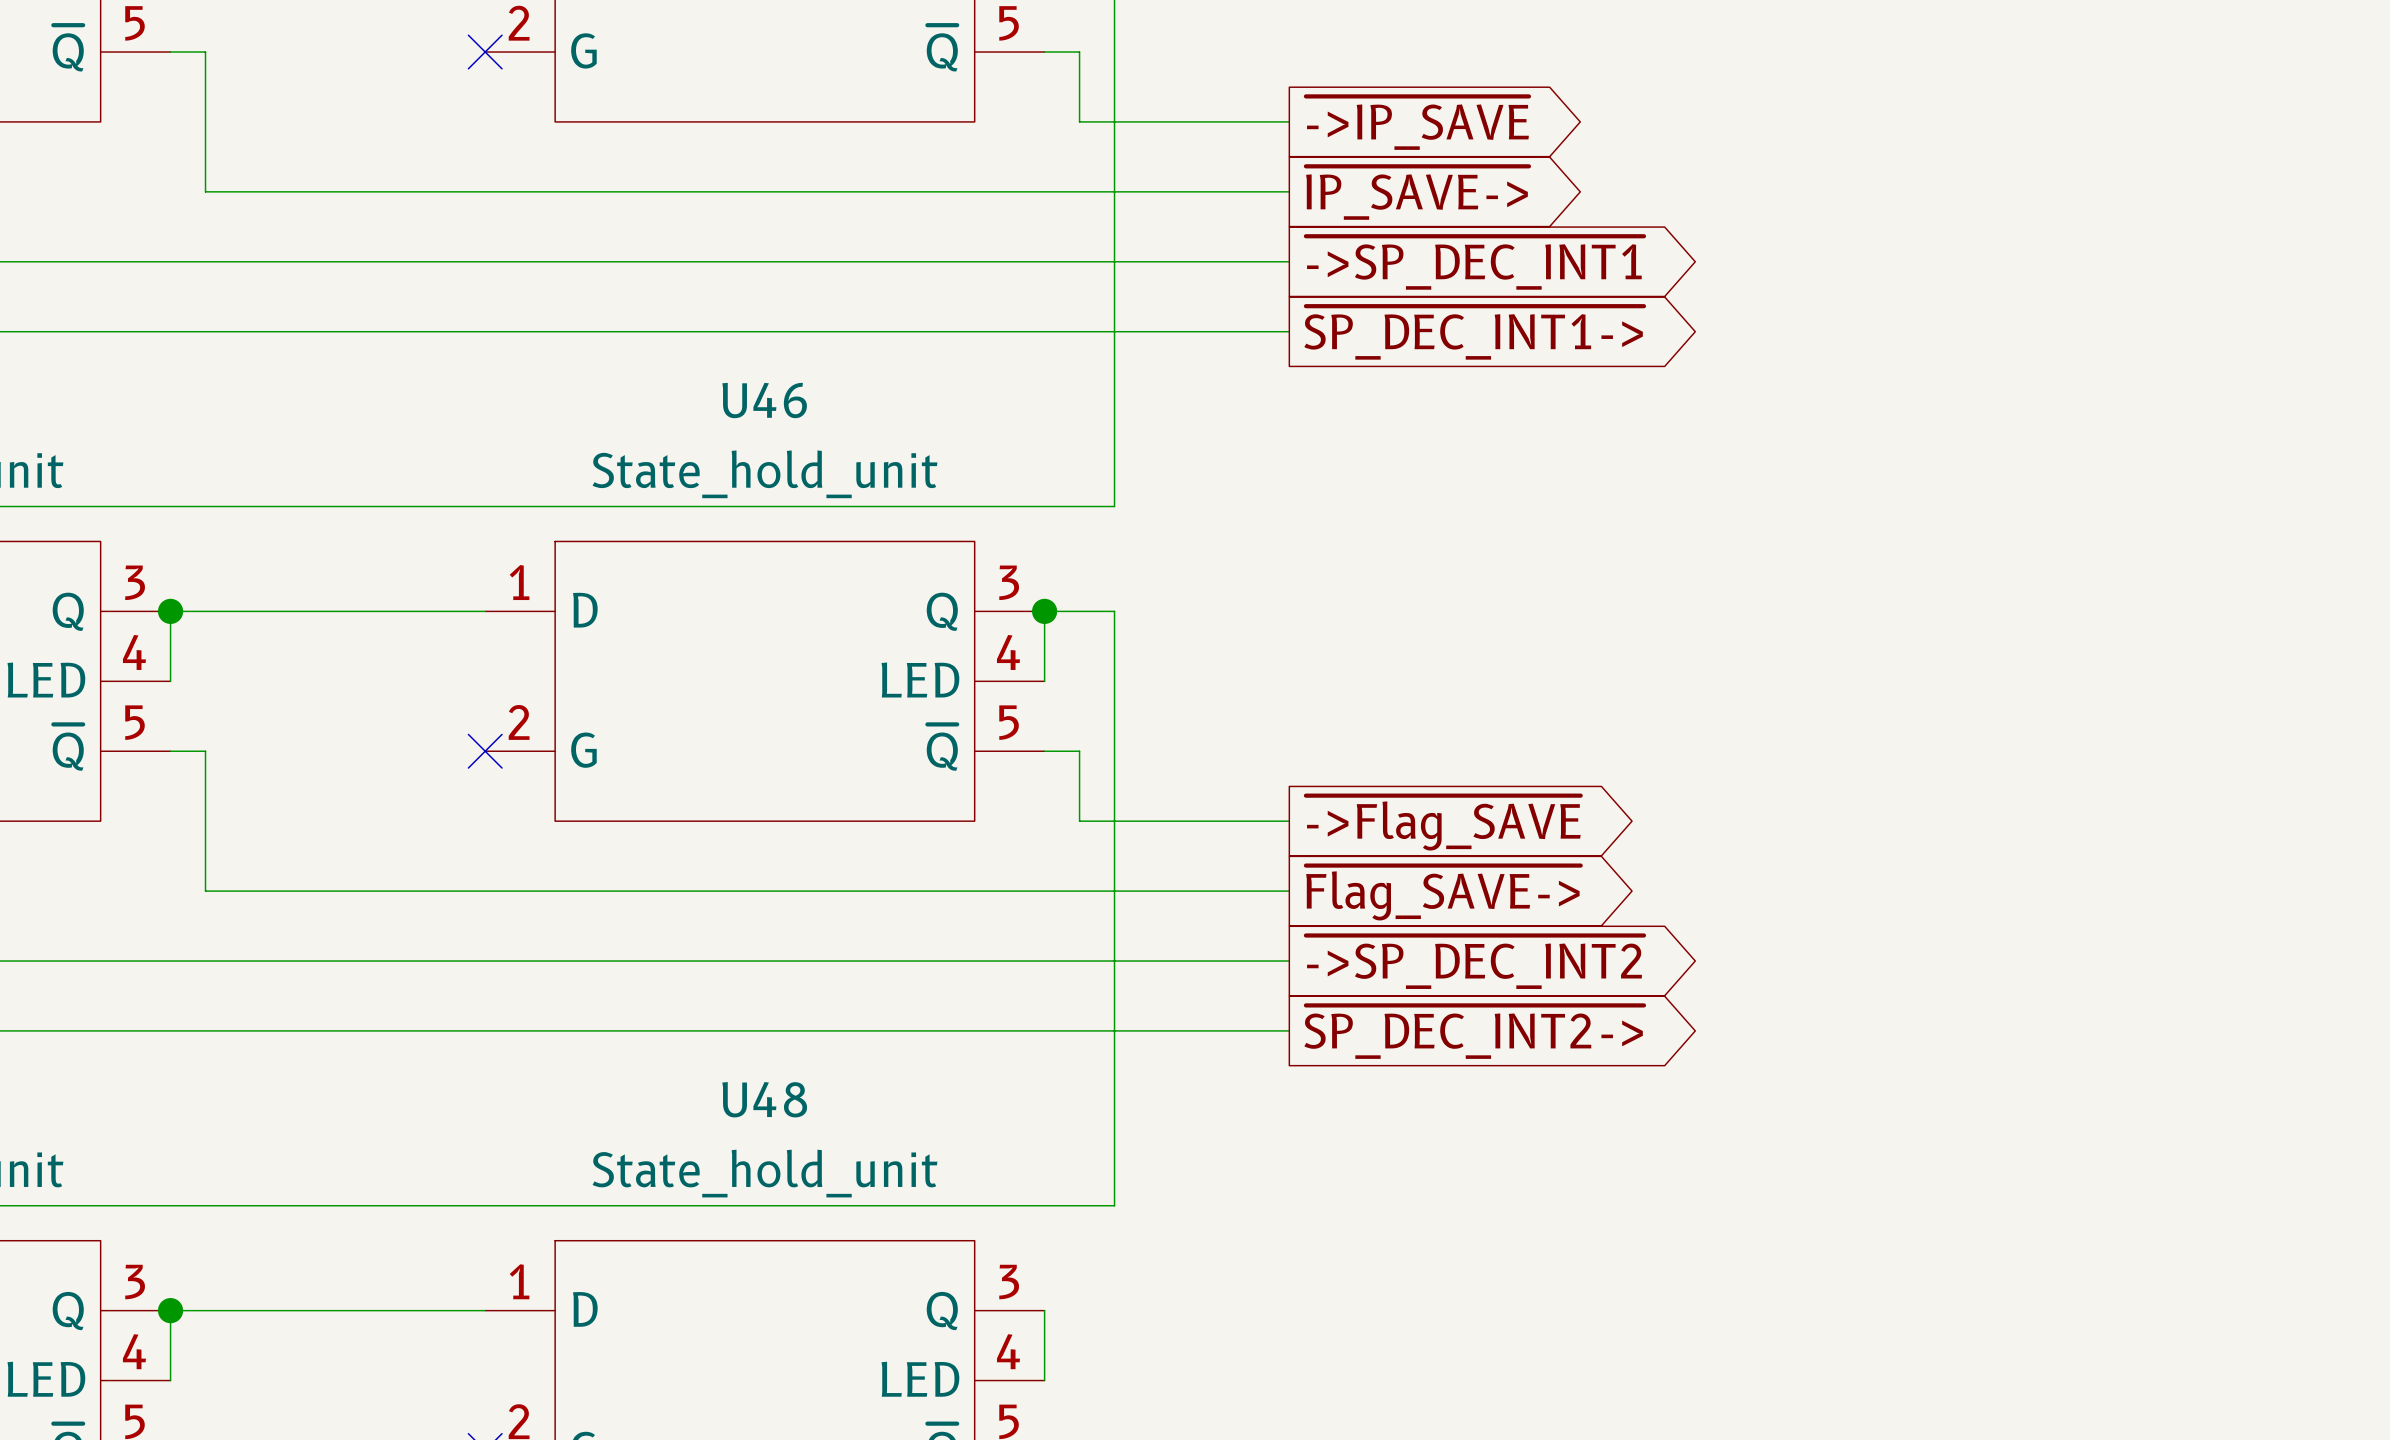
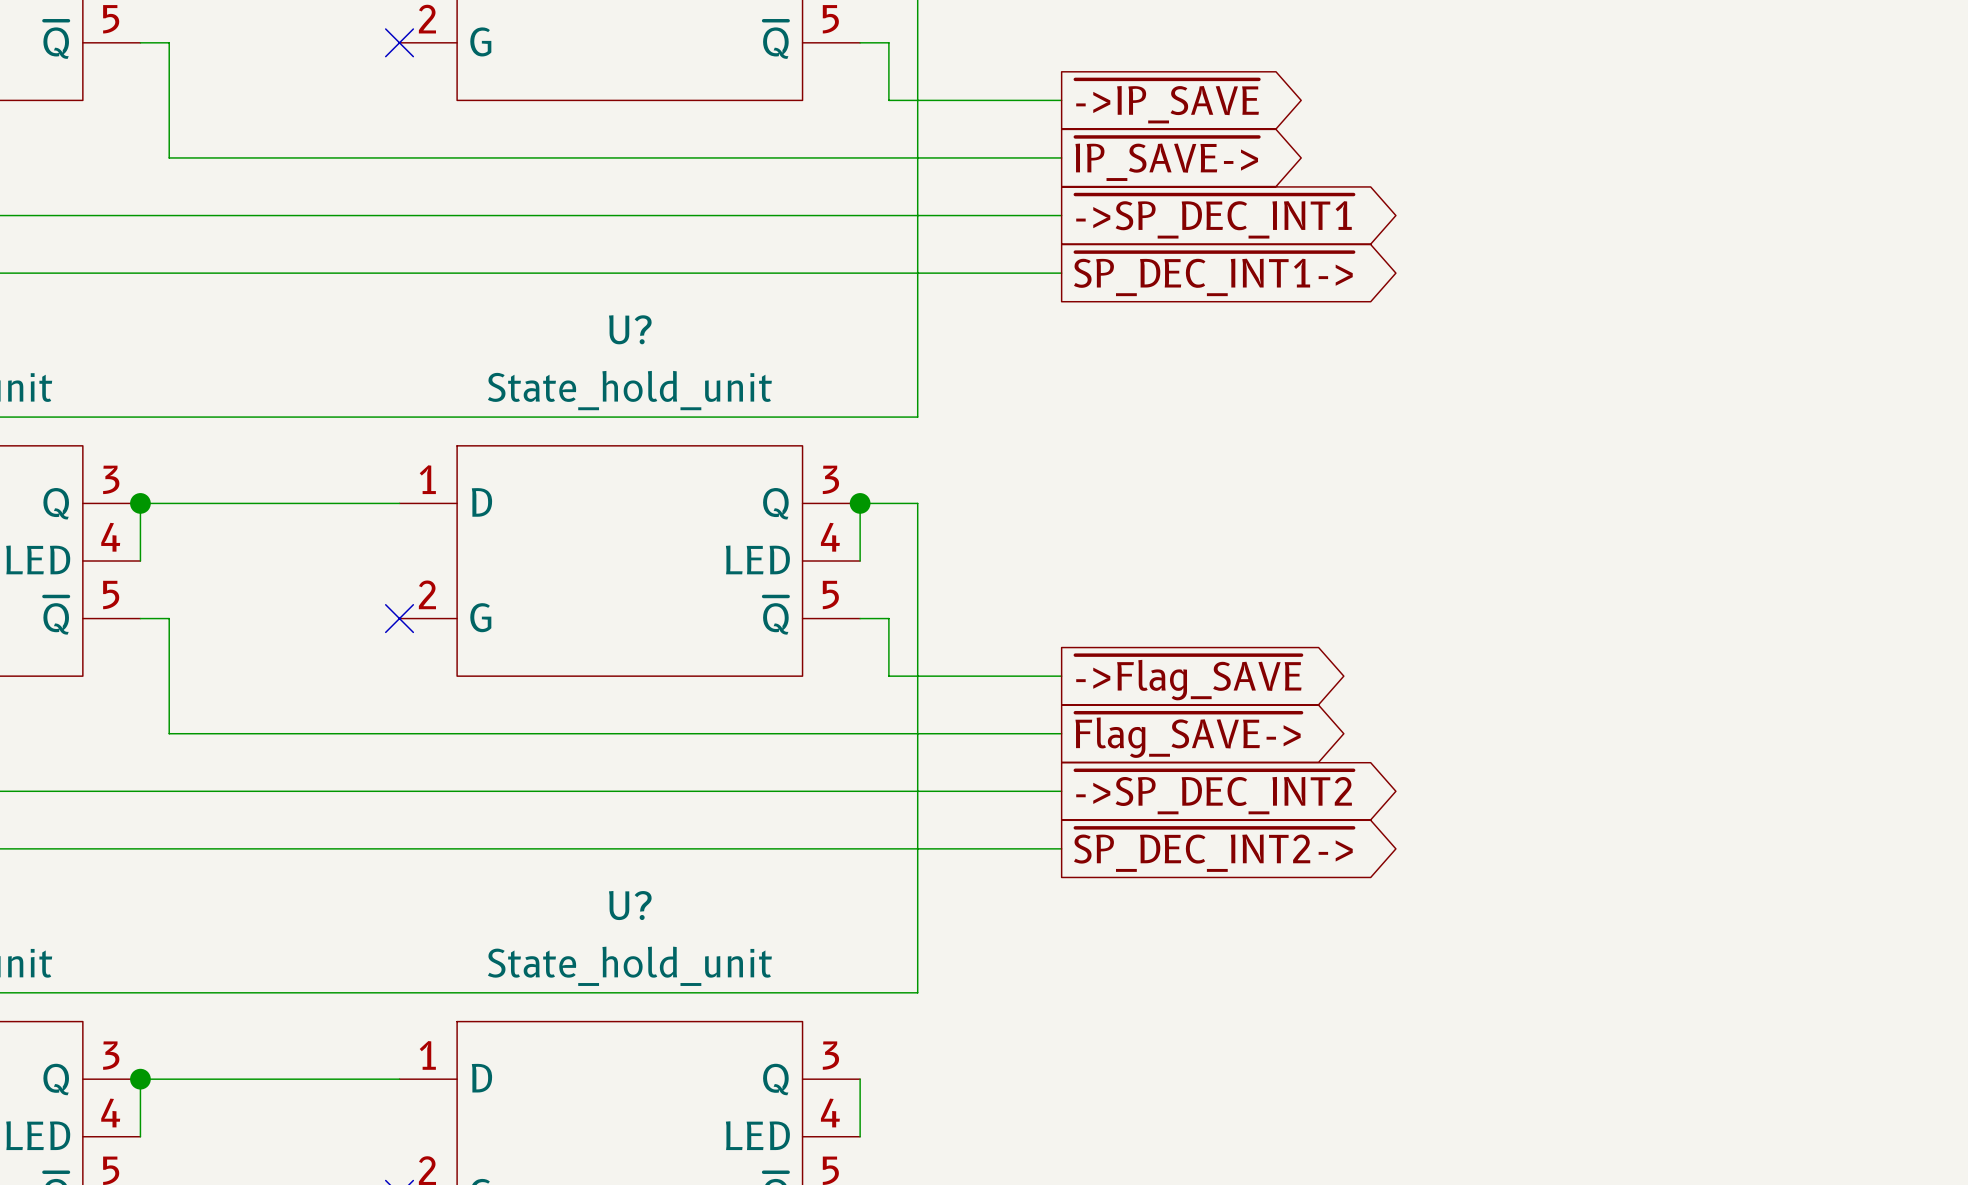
U46 name: U46 (764, 400) -> U? (630, 329)
U48 name: U48 (764, 1099) -> U? (630, 905)

